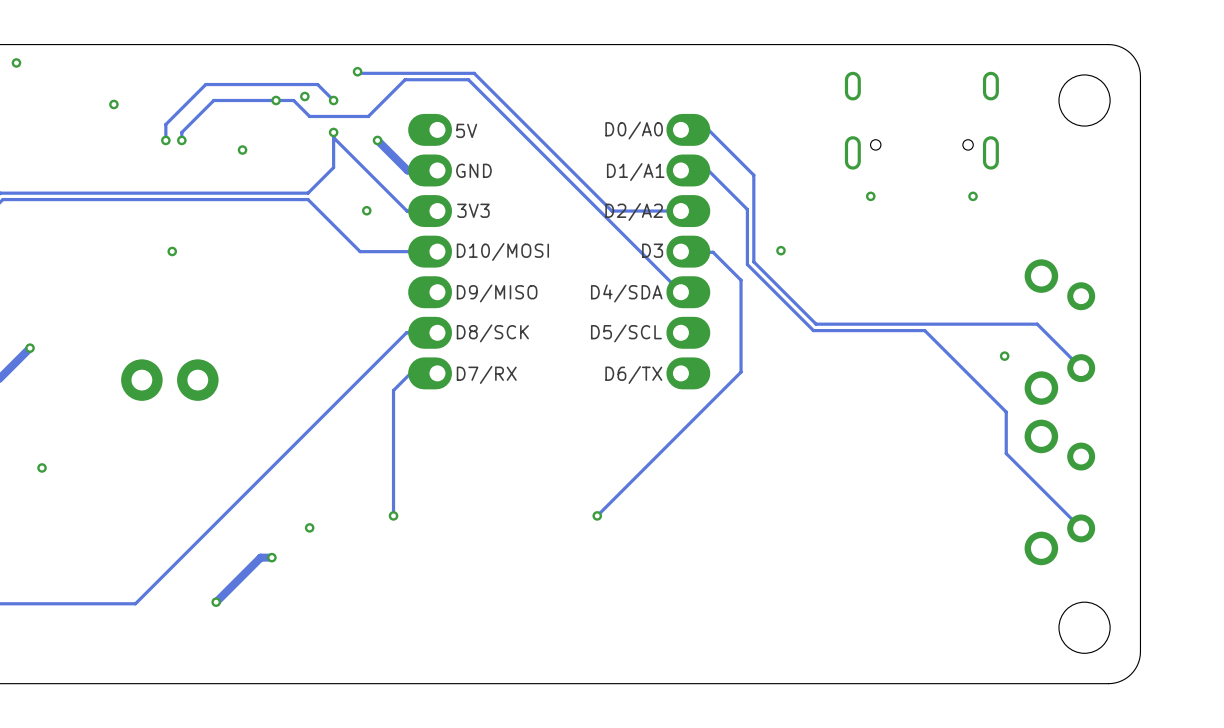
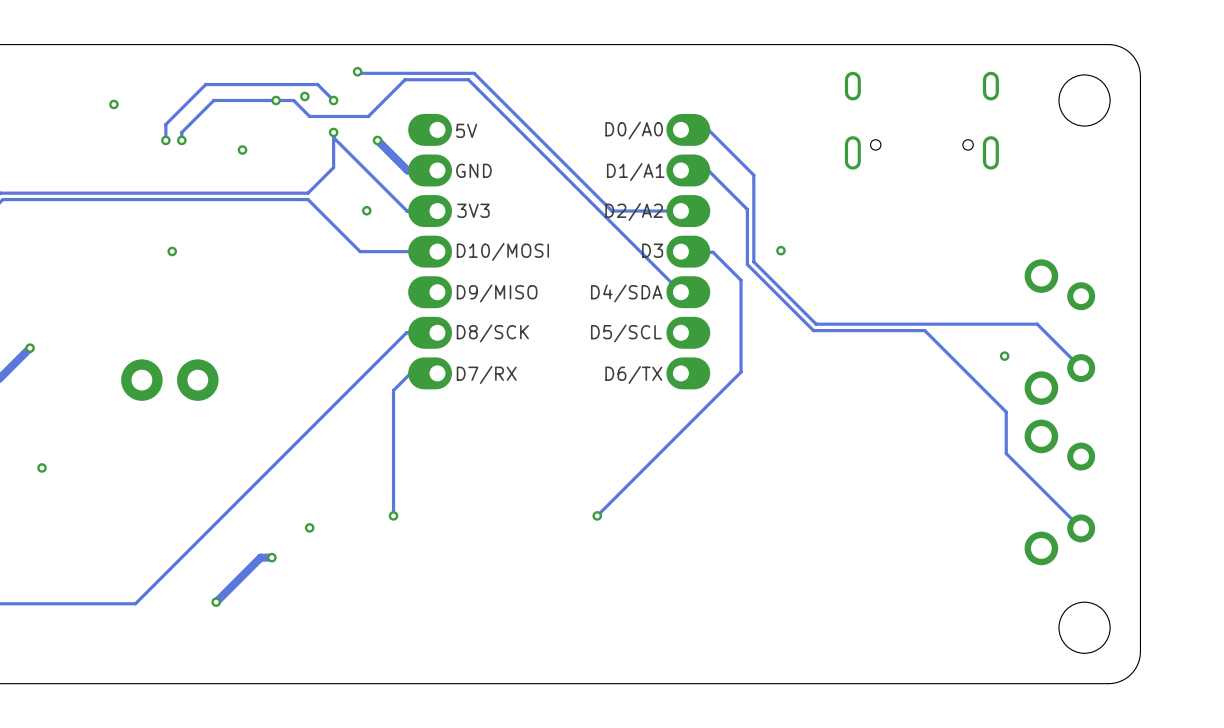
via: (16, 62) -> none
via: (870, 196) -> none
via: (973, 196) -> none

